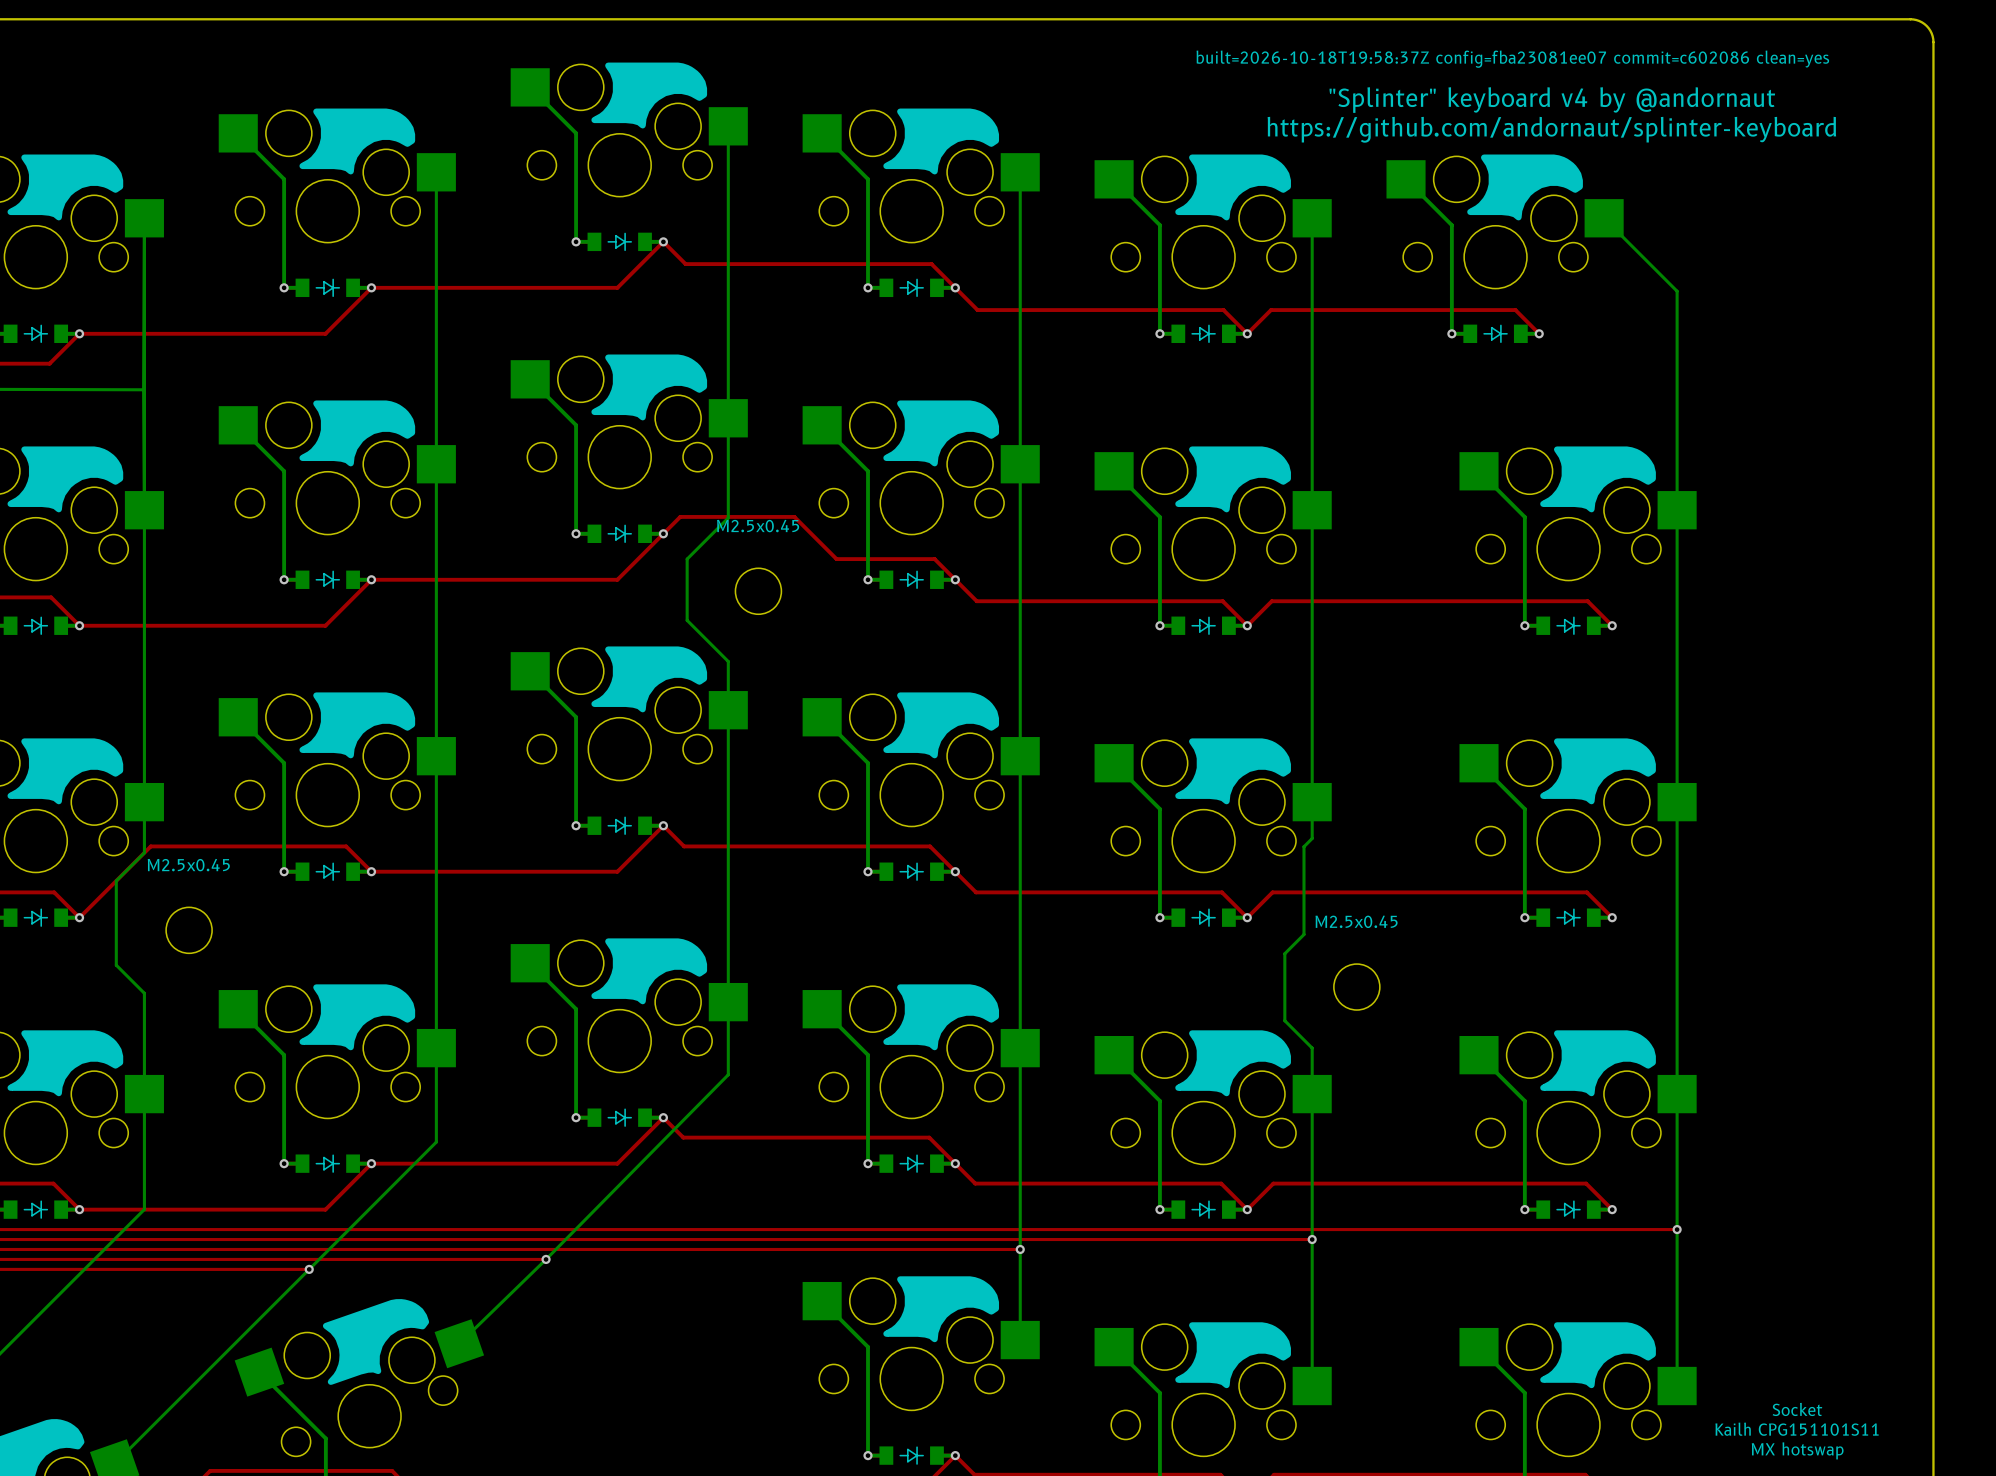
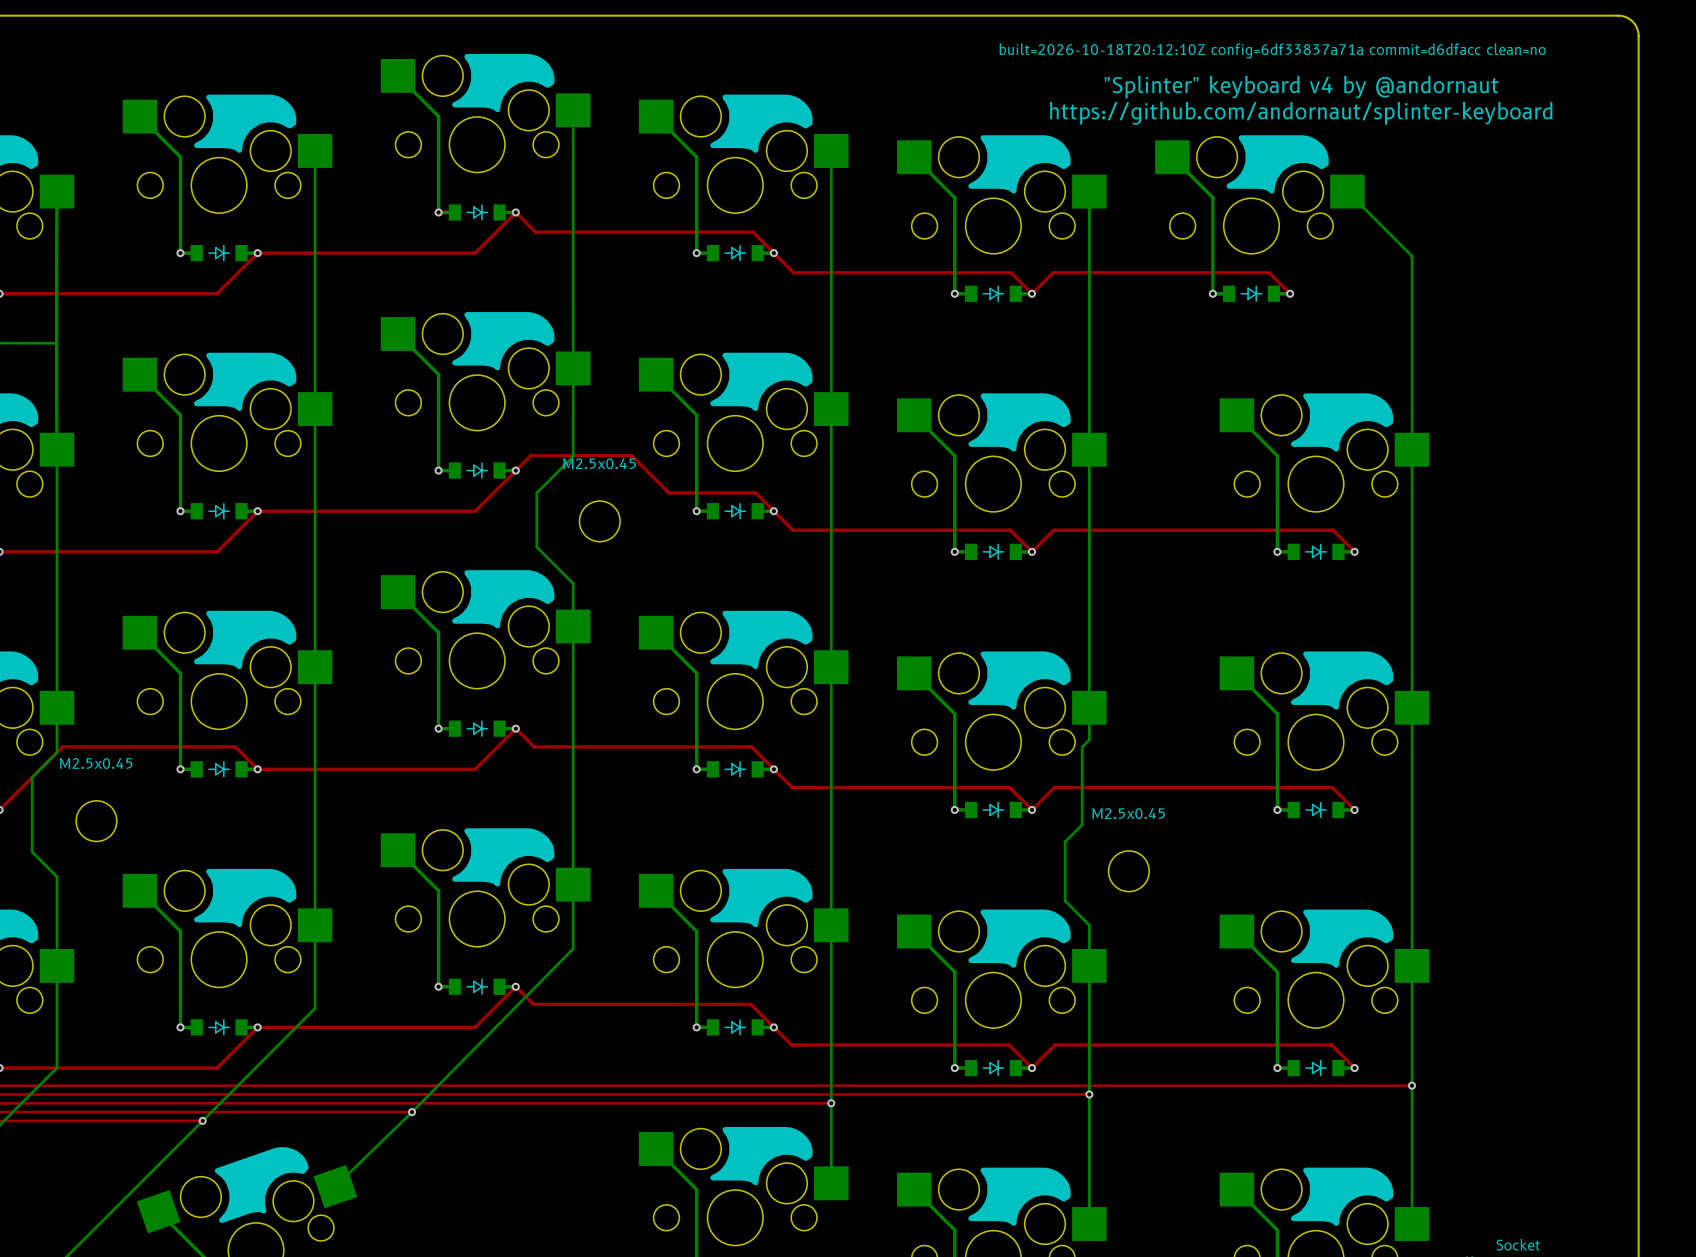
text: built=2026-10-18T19:58:37Z config=fba23081ee07 commit=c602086 clean=yes (1512, 59) -> built=2026-10-18T20:12:10Z config=6df33837a71a commit=d6dfacc clean=no (1272, 50)

